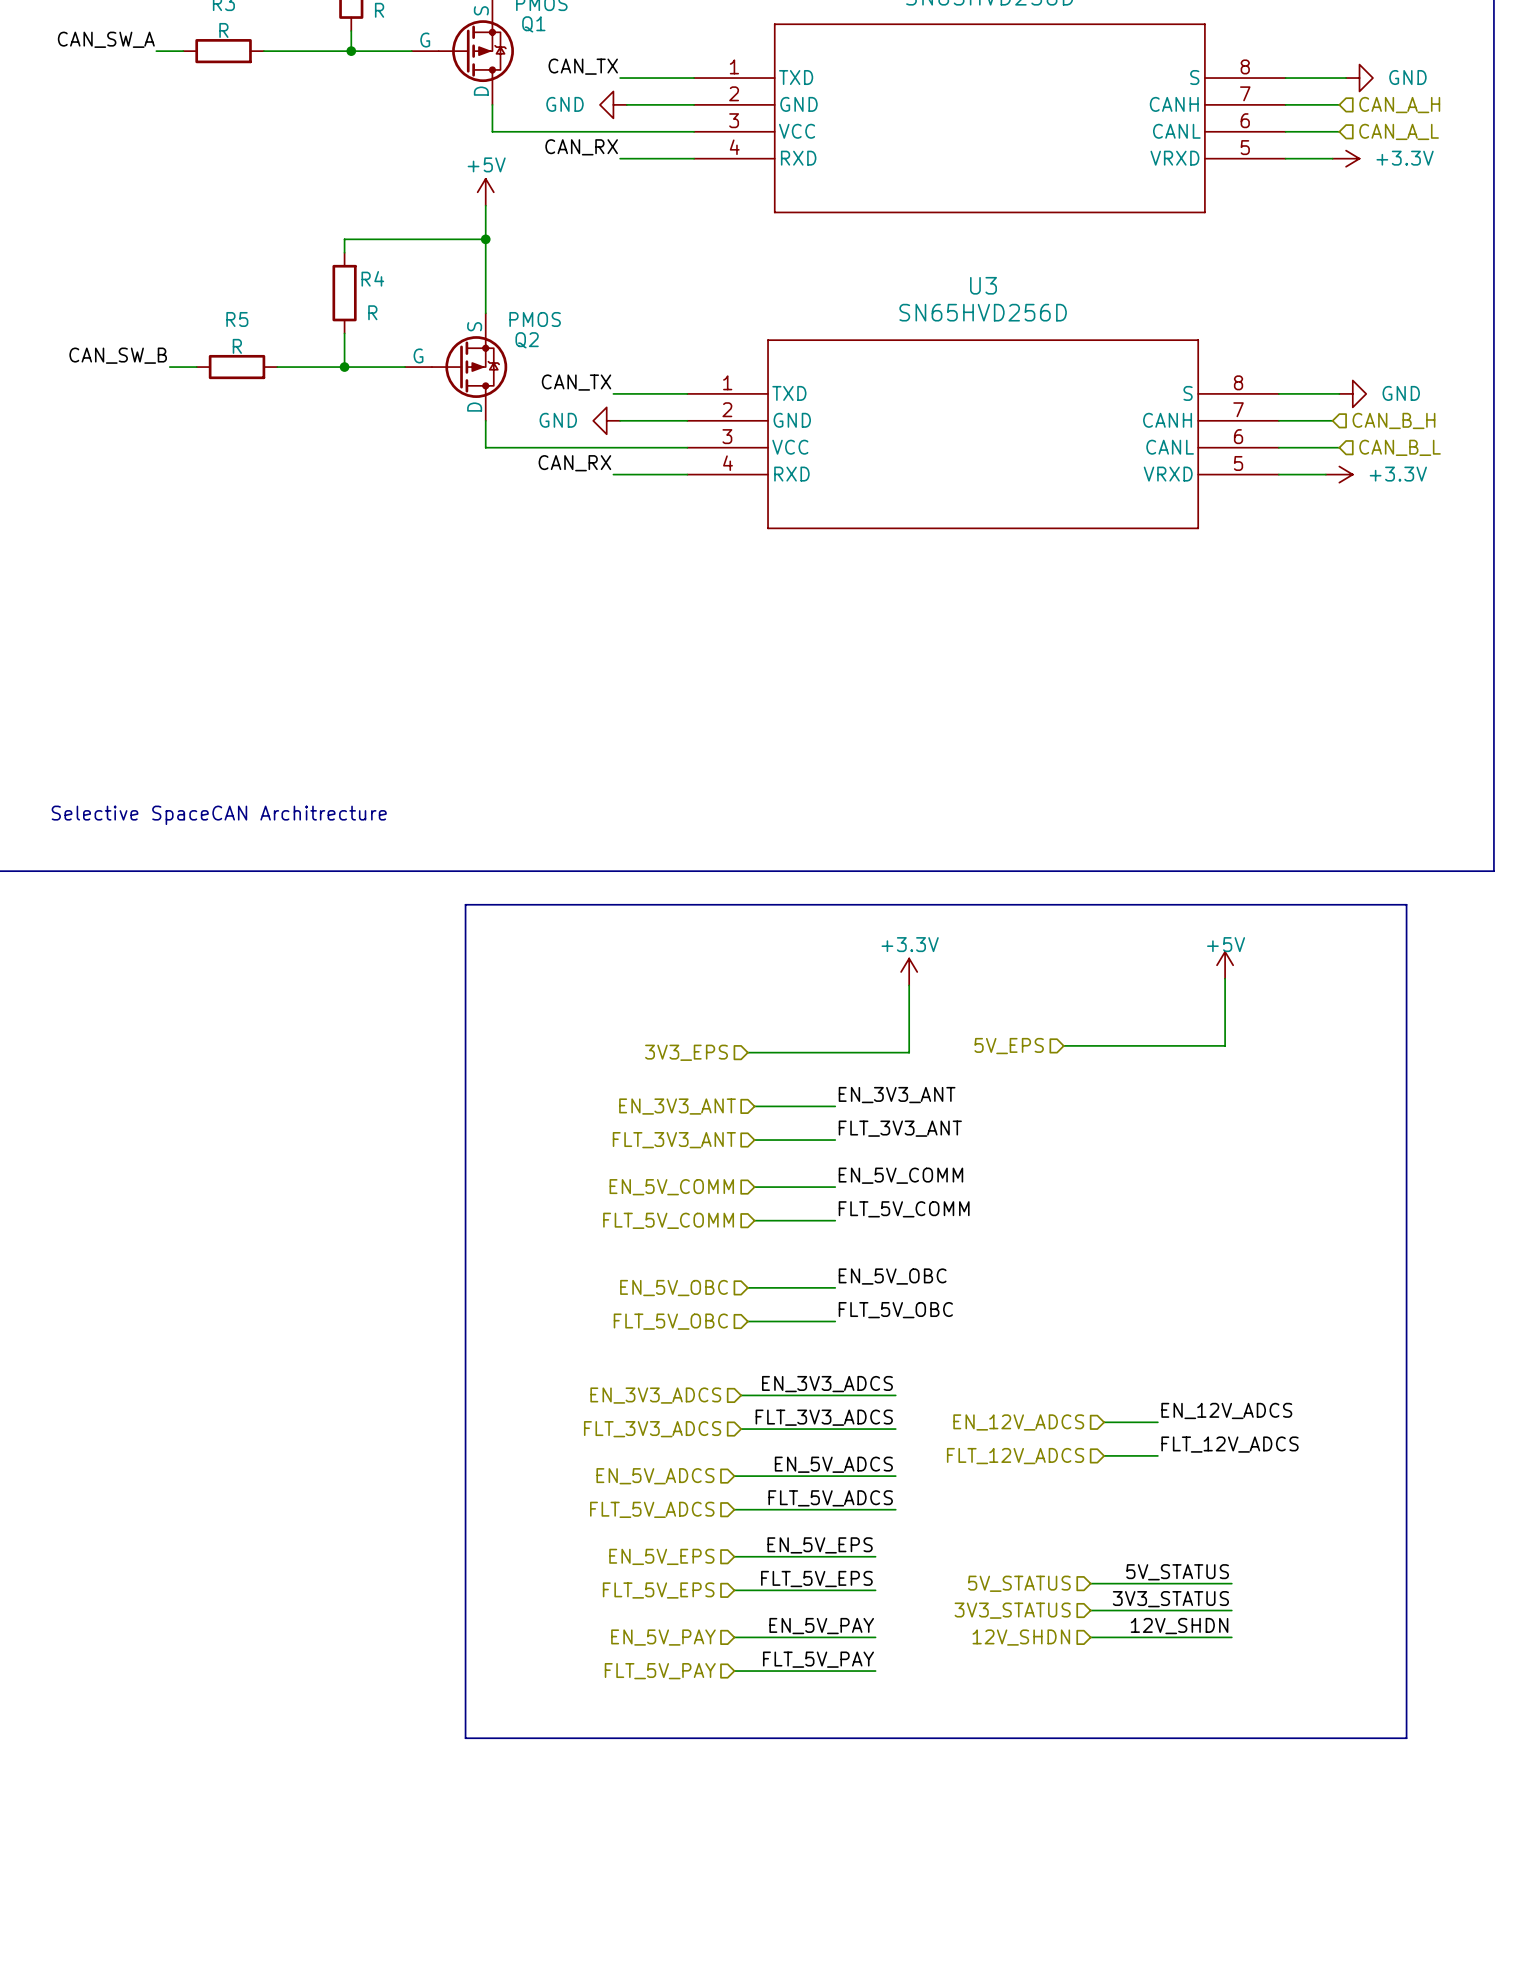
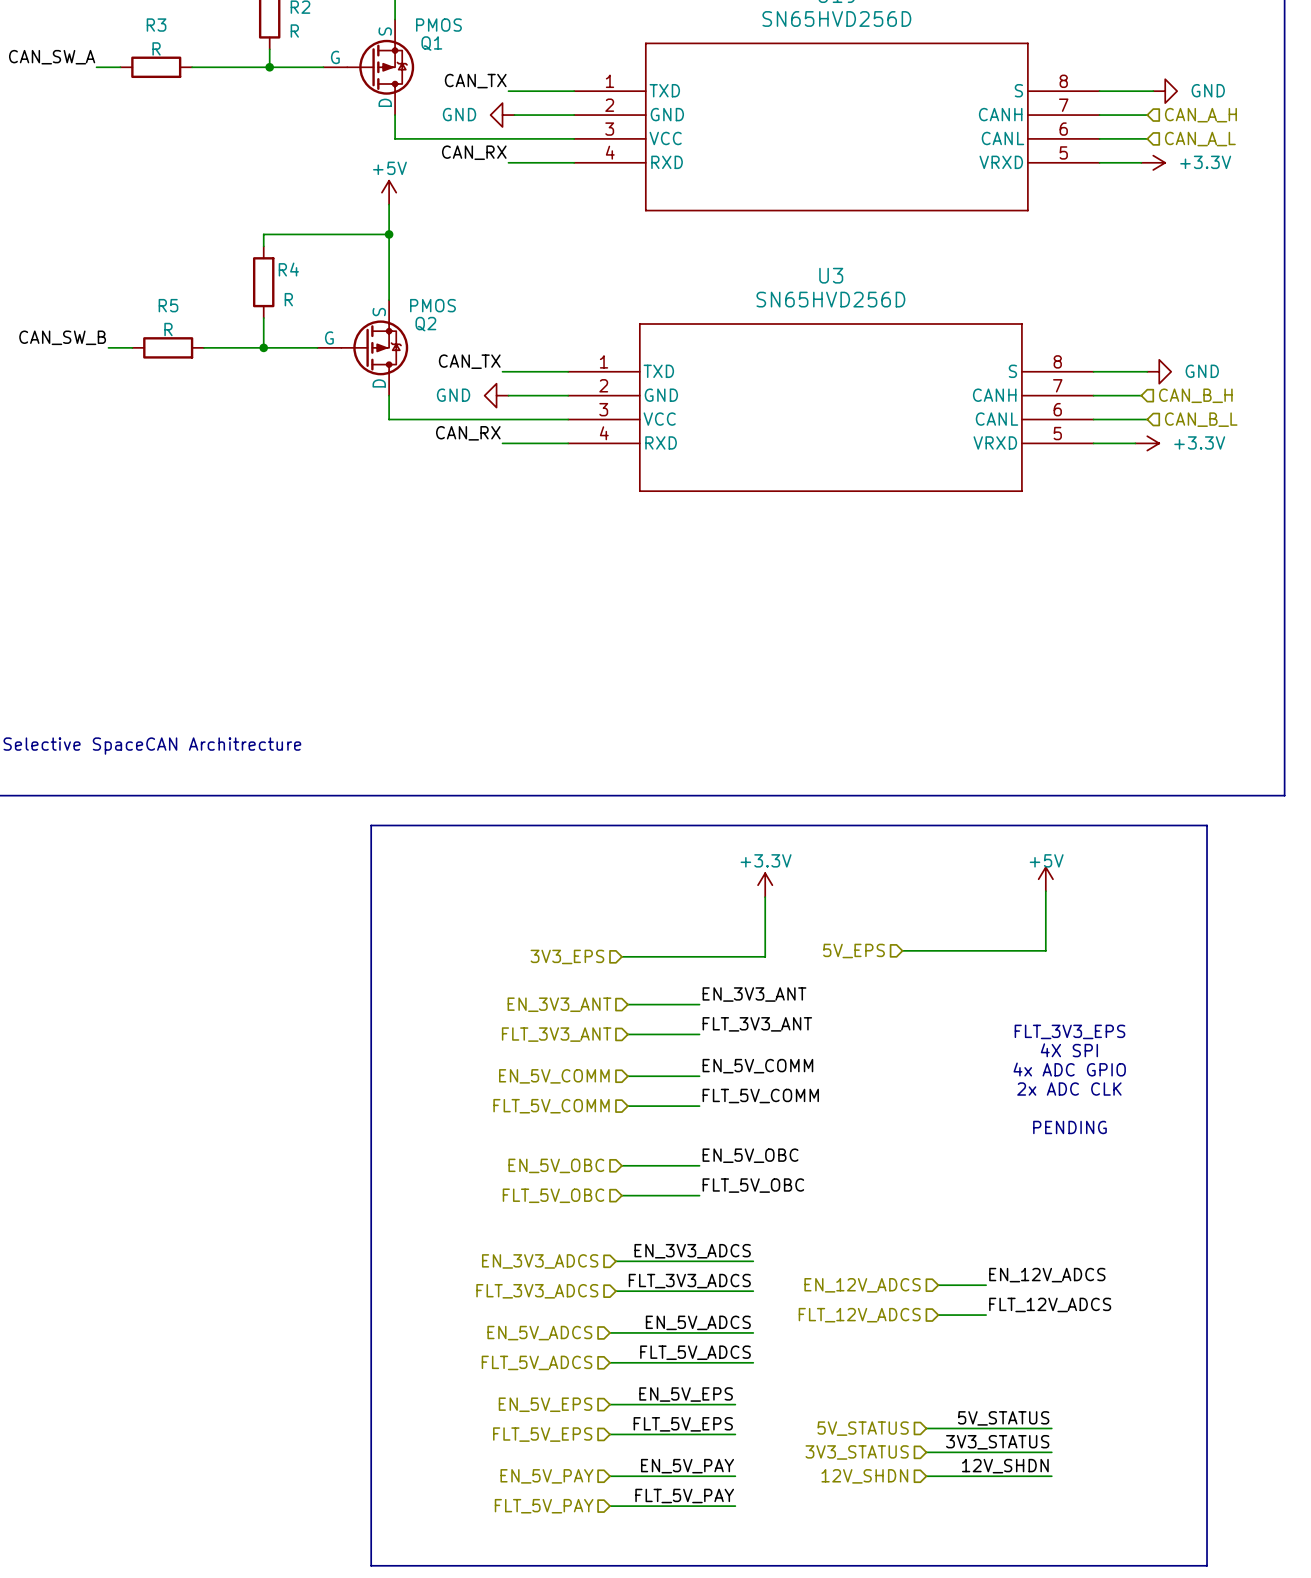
text: none -> FLT_3V3_EPS (1069, 1031)
text: none -> 4X SPI (1069, 1050)
text: none -> 4x ADC GPIO (1069, 1069)
text: none -> 2x ADC CLK (1069, 1089)
text: none -> PENDING (1069, 1127)

